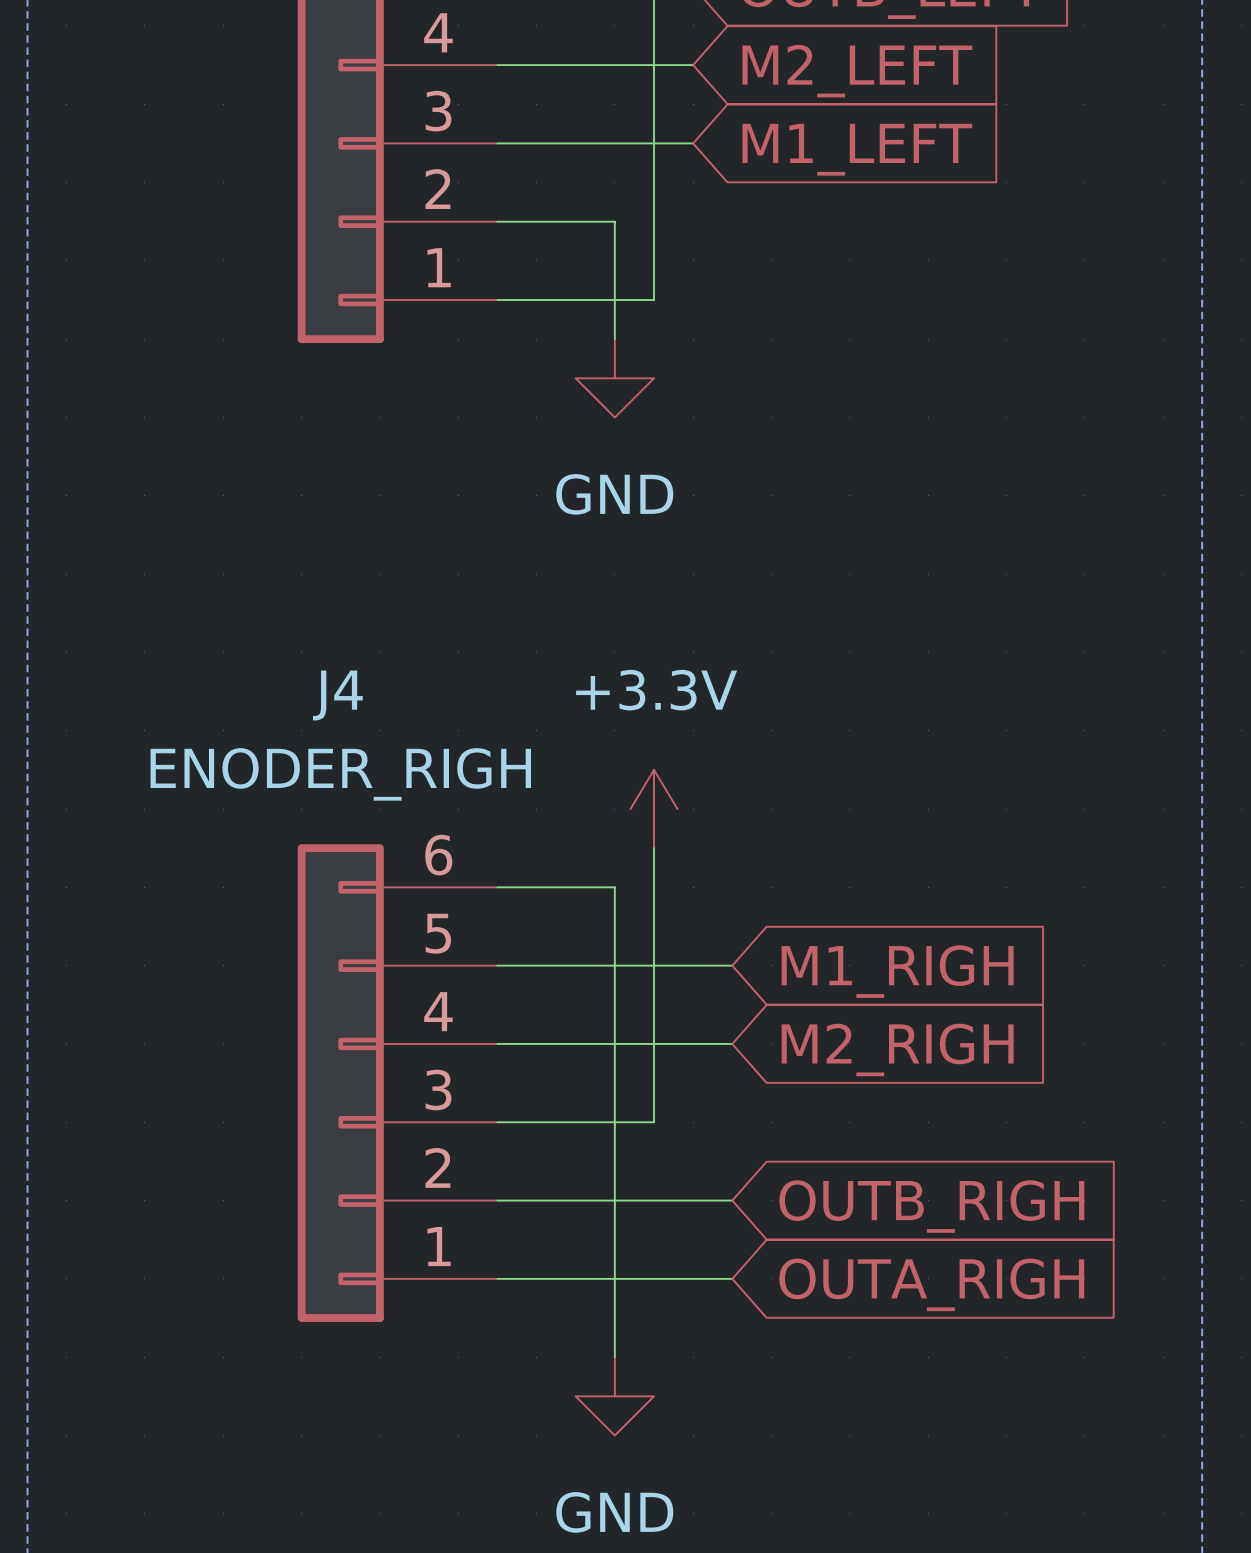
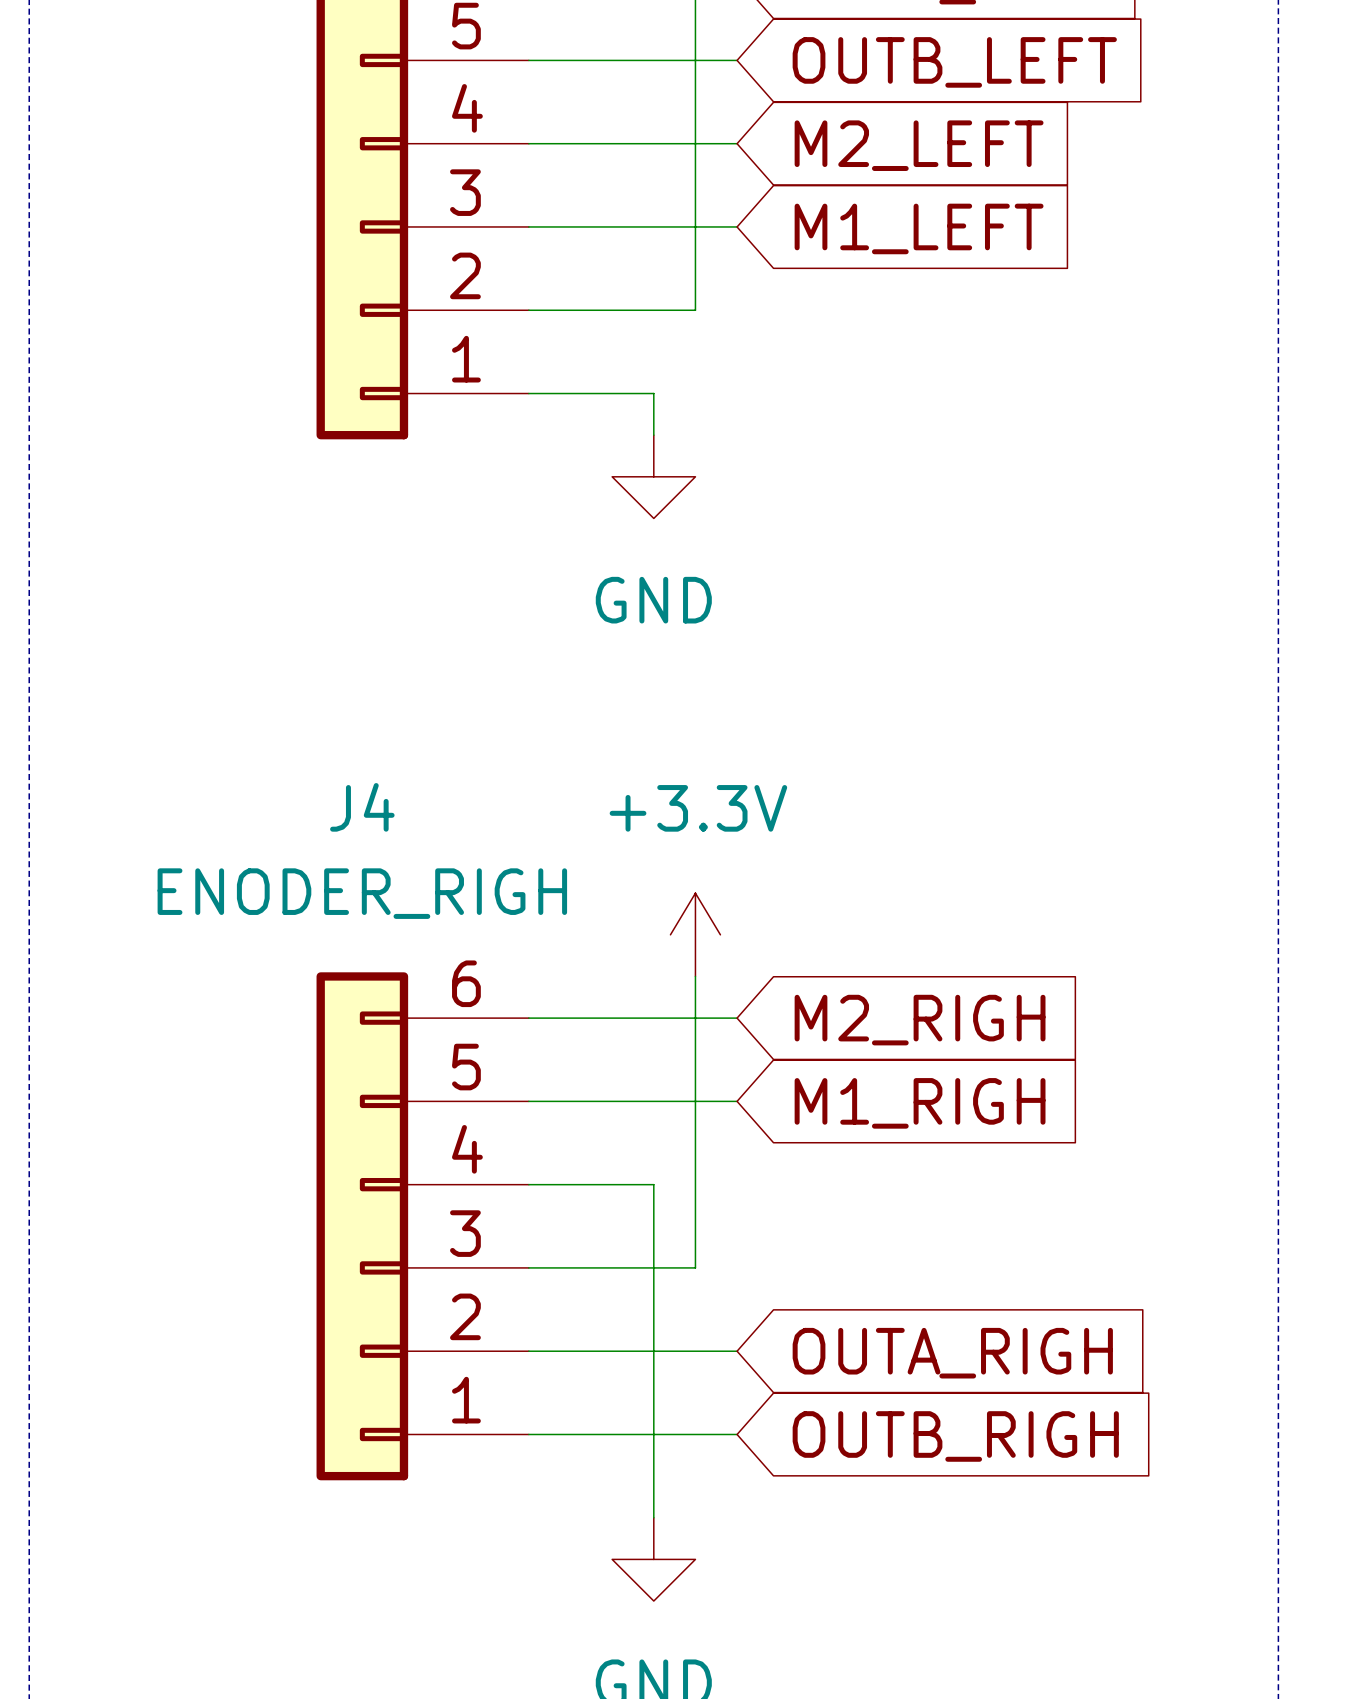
wire: (614, 221) (614, 300) (653, 300) (653, 221) -> (653, 310) (695, 310)
wire: (614, 887) (614, 1043) (732, 1043) -> (653, 1018) (737, 1018)
wire: (693, 965) (732, 965) -> none
global label position: M1_RIGH (897, 971) -> M1_RIGH (920, 1103)
global label position: M2_RIGH (897, 1049) -> M2_RIGH (920, 1020)
wire: (693, 1200) (732, 1200) -> none
global label position: OUTB_RIGH (931, 1206) -> OUTB_RIGH (955, 1436)
wire: (693, 1278) (732, 1278) -> none
global label position: OUTA_RIGH (931, 1284) -> OUTA_RIGH (952, 1353)

